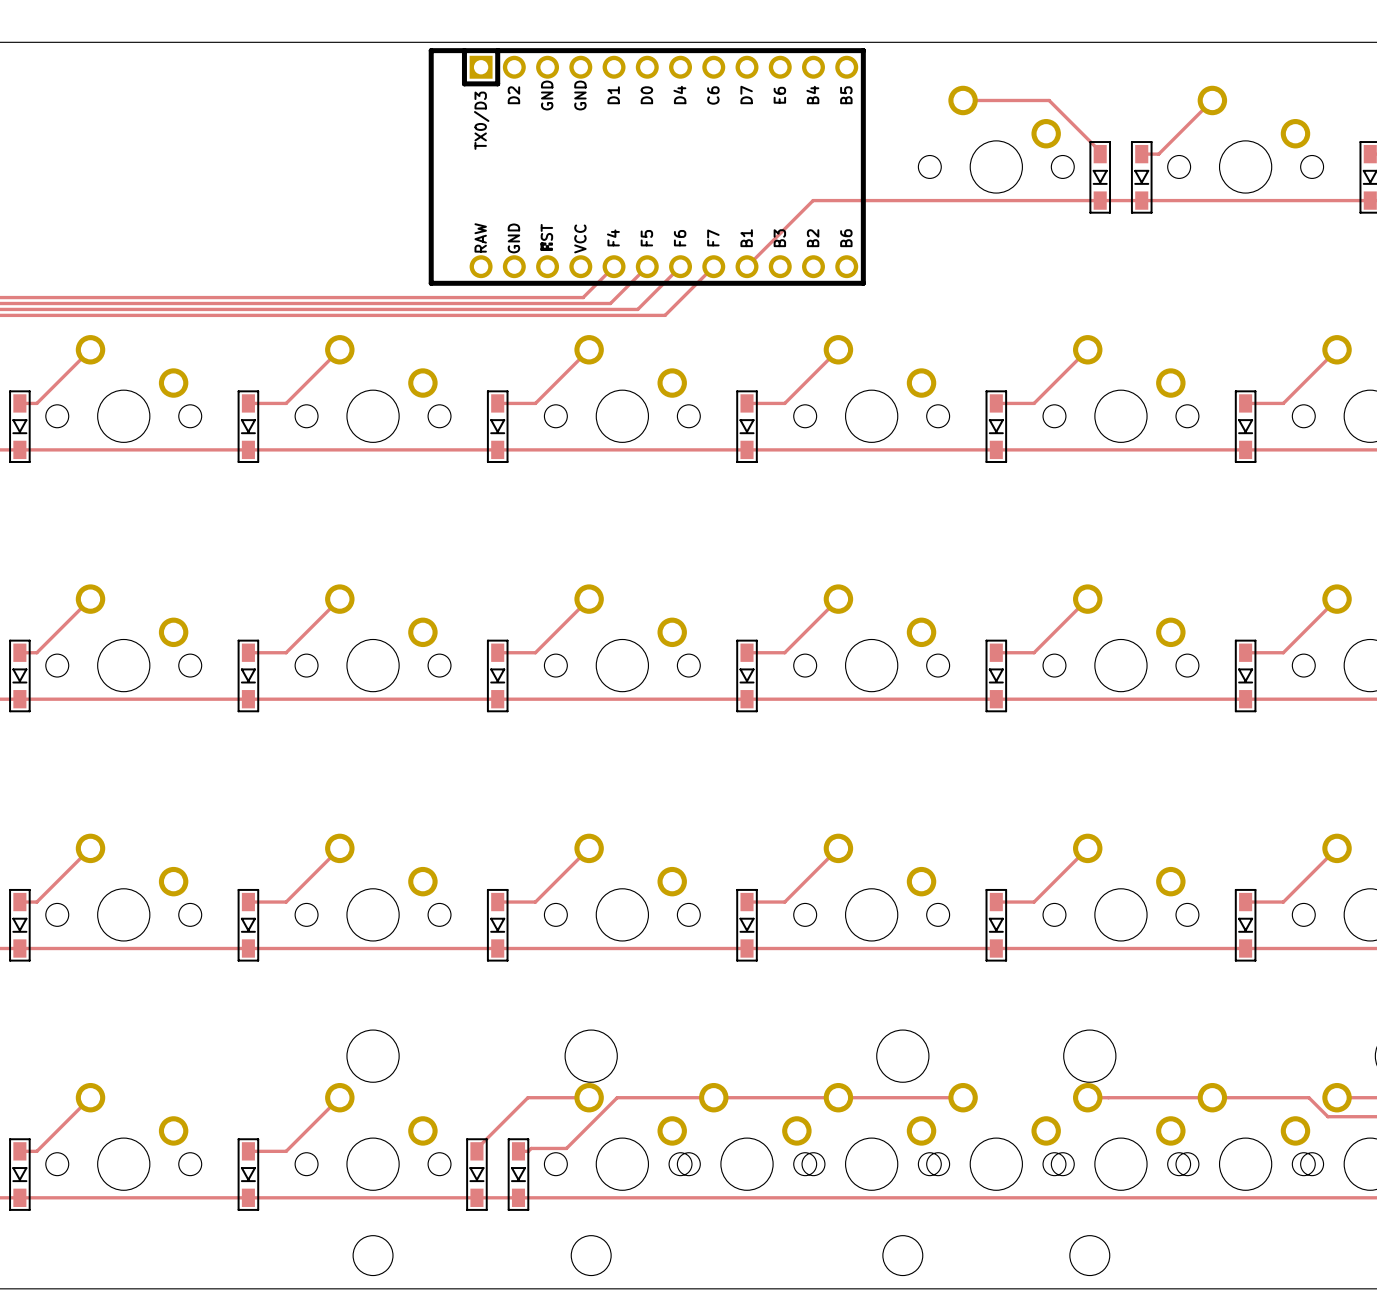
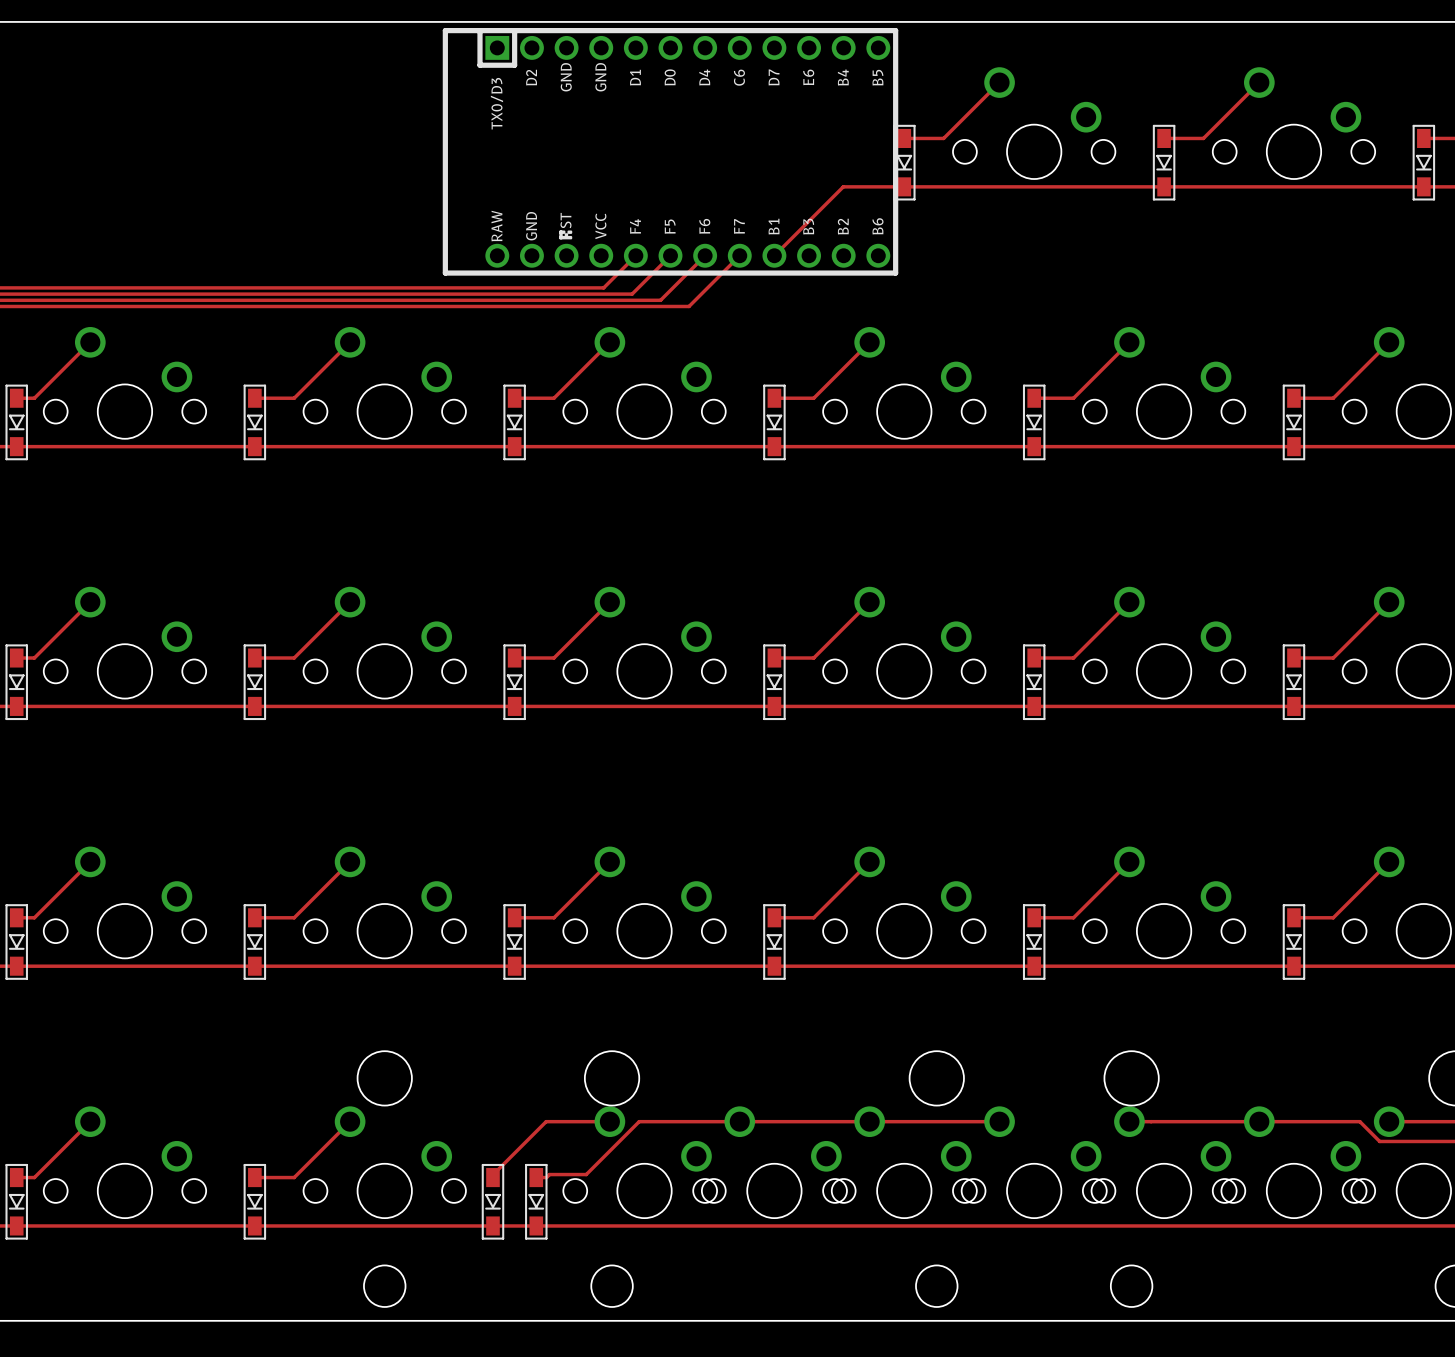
track: (963, 100) (1049, 100) (1100, 151) (1100, 154) -> (999, 82) (943, 138) (904, 138)
track: none -> (1164, 138) (1185, 138)
part: none -> (904, 162)
part: (1100, 177) -> none
part: none -> (1164, 162)
part: (1141, 177) -> none

